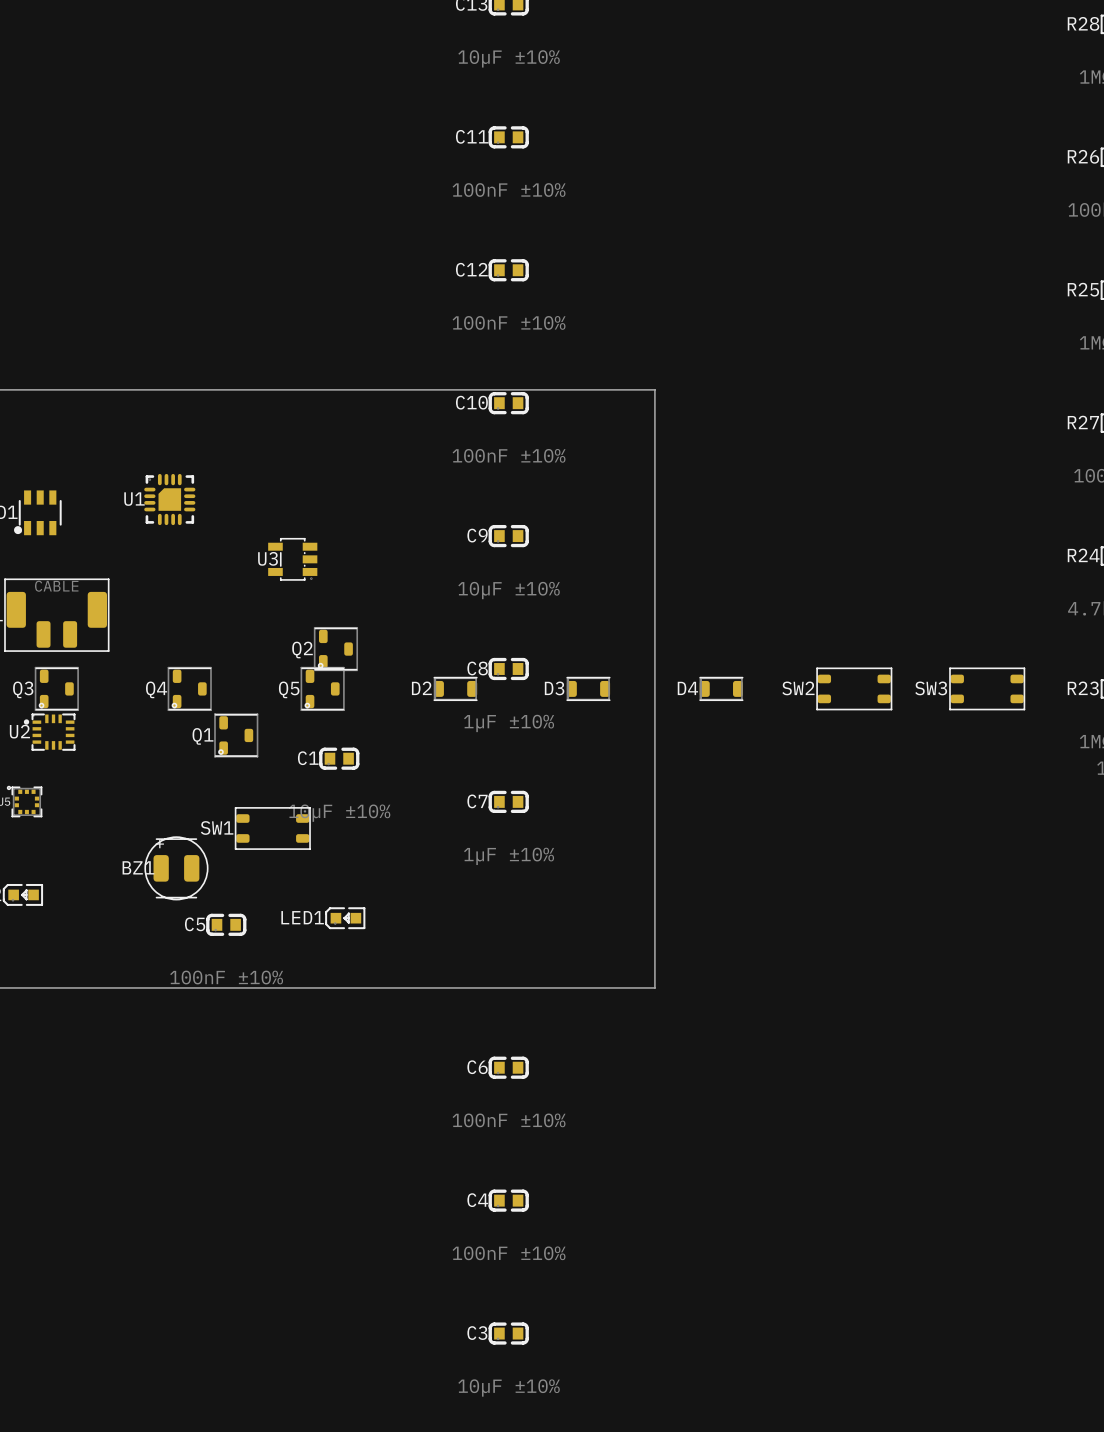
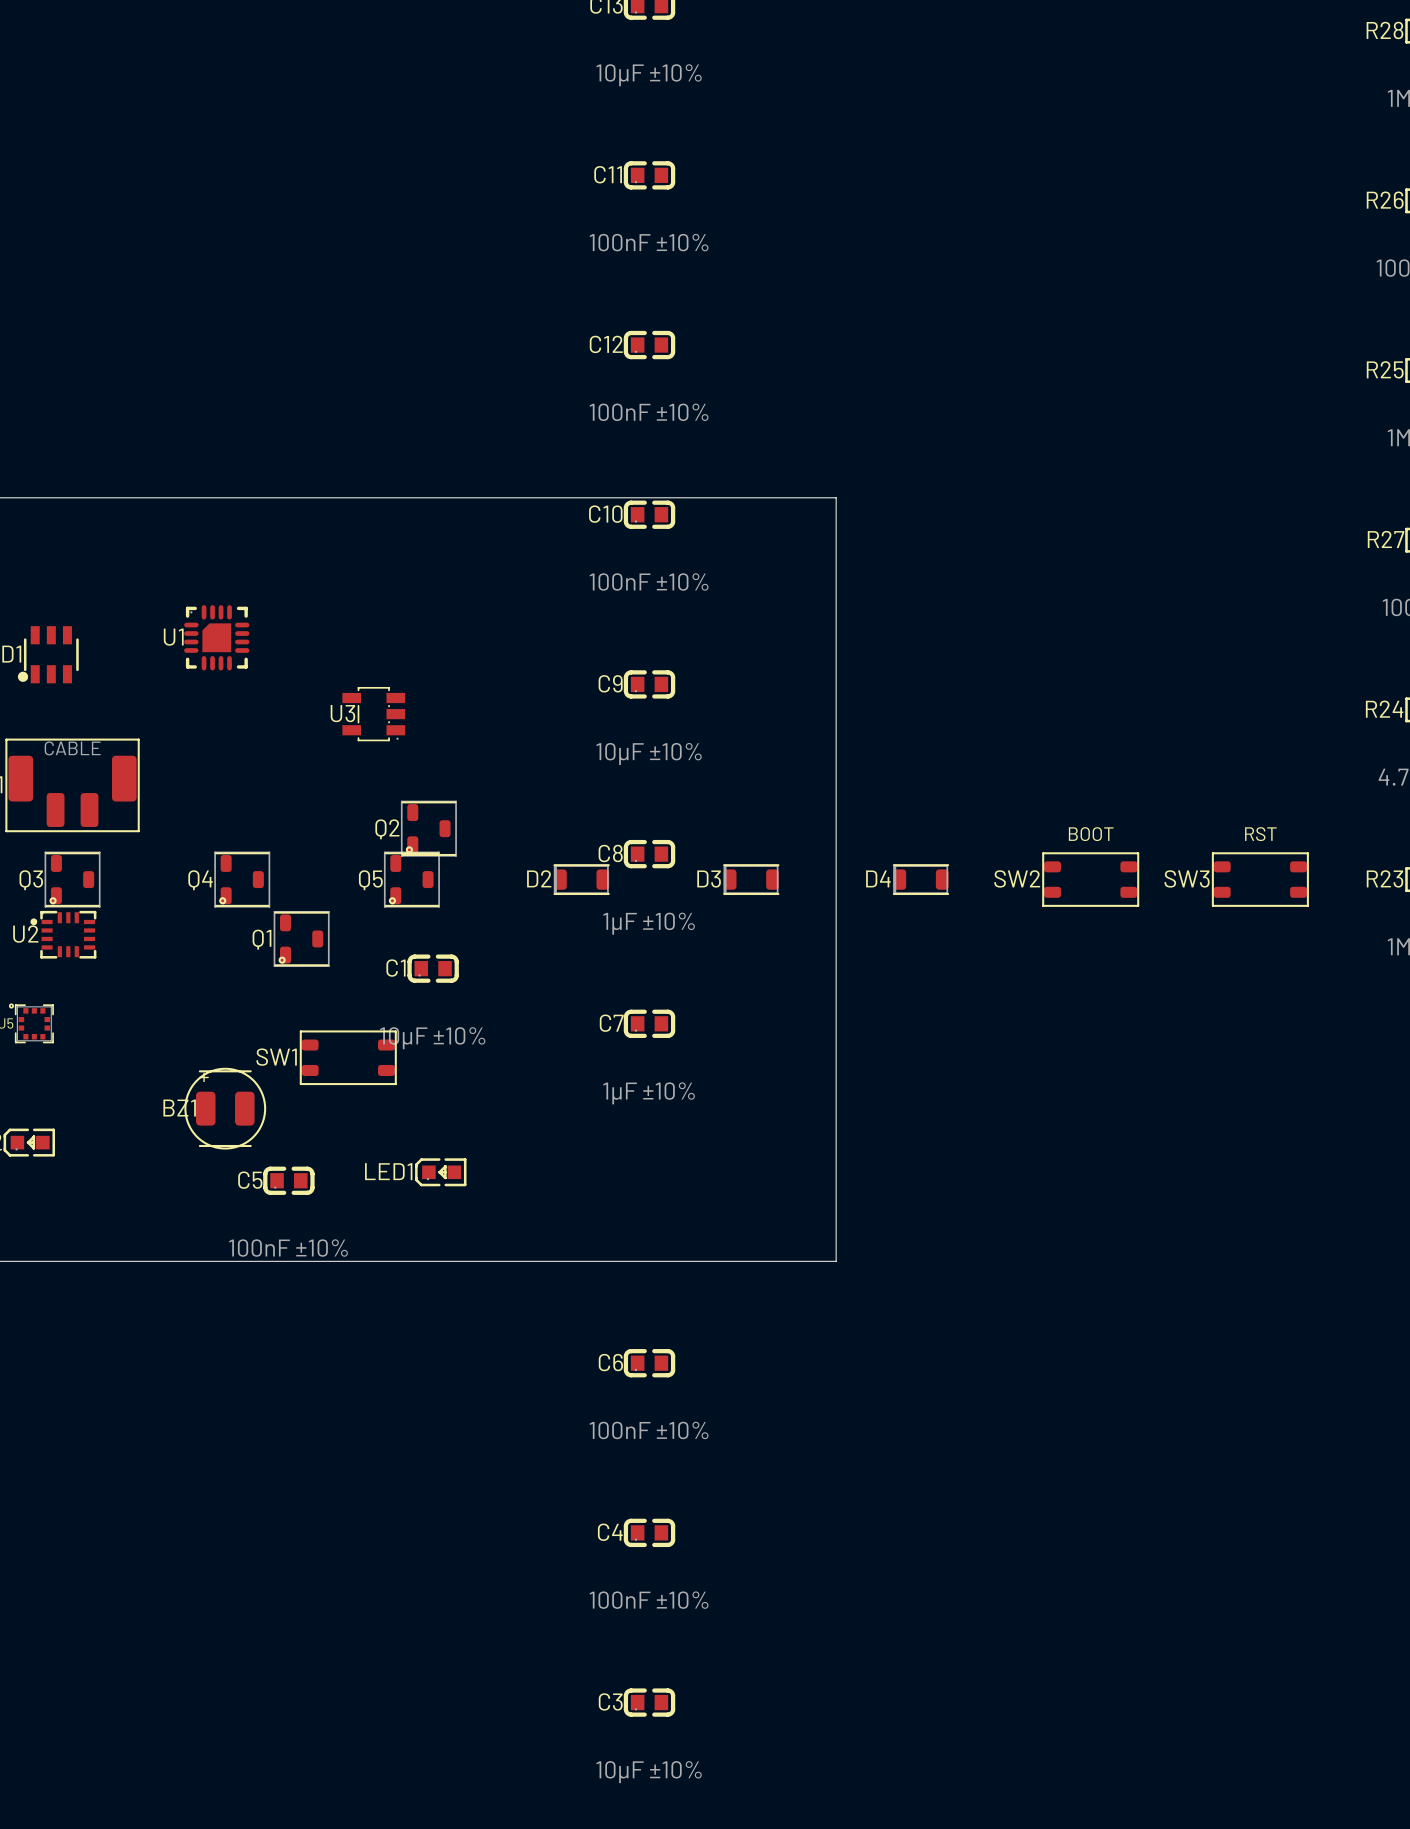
SW2 text: none -> BOOT (1091, 834)
SW3 text: none -> RST (1260, 834)

